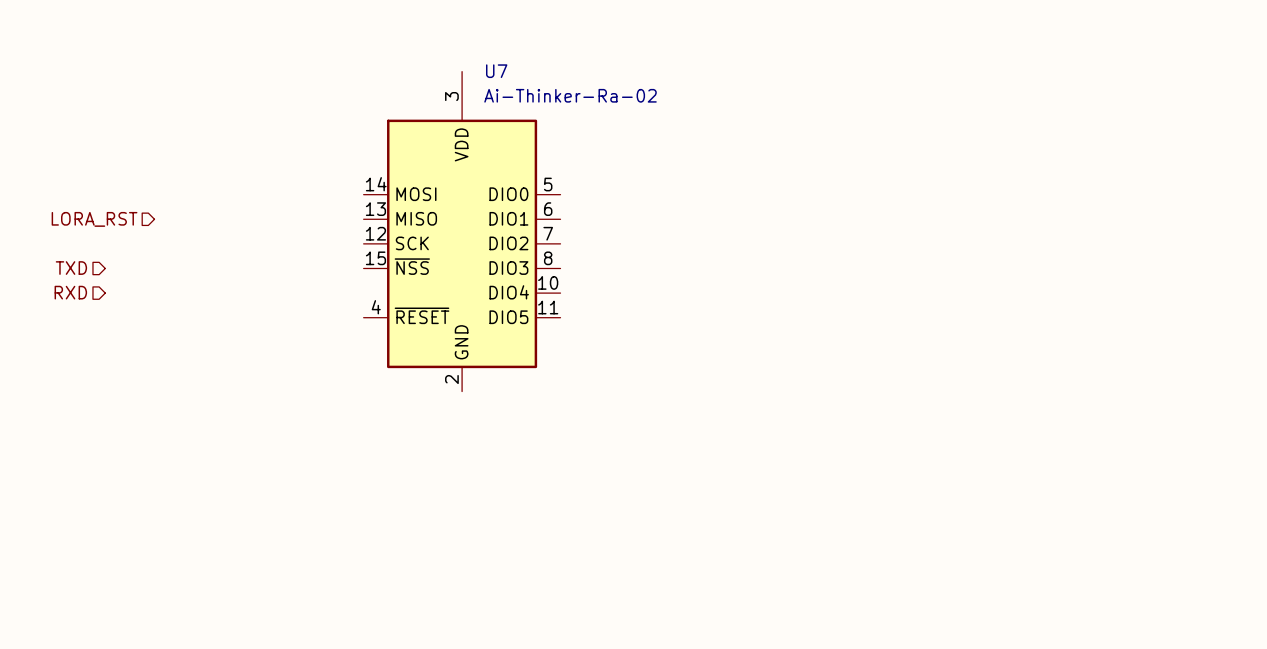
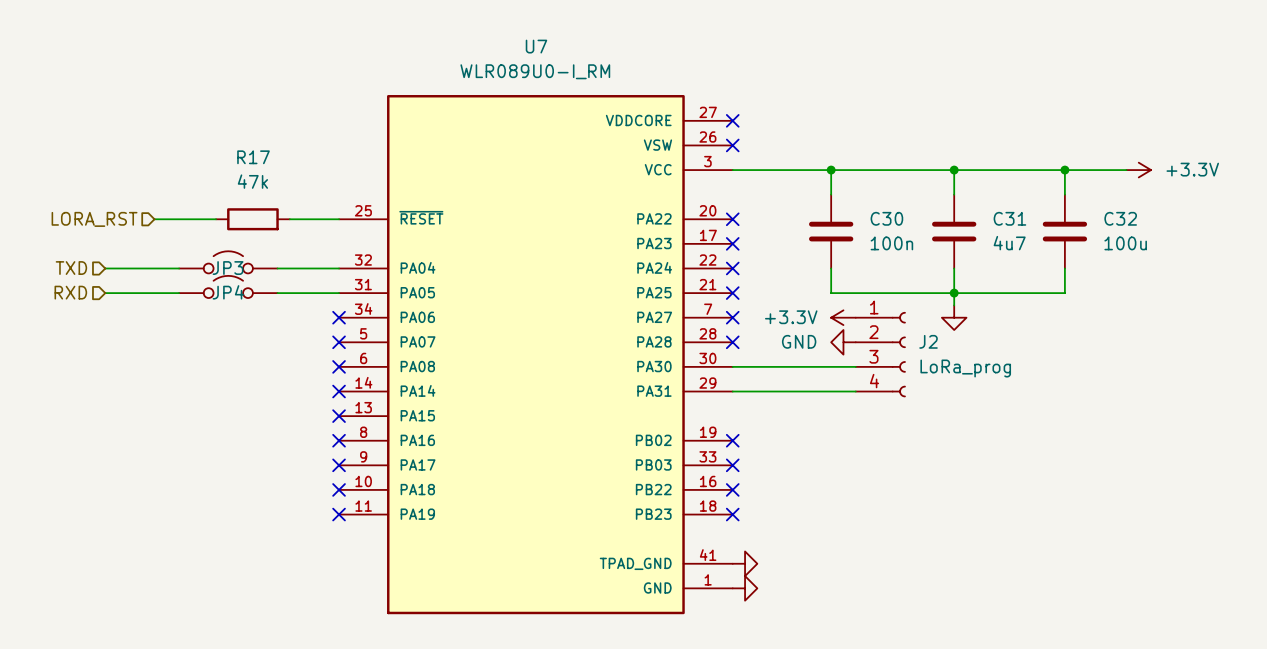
U7 symbol: [363, 71, 561, 392] -> [339, 95, 733, 615]
U7 name position: U7 (496, 71) -> U7 (536, 46)
U7 value: Ai-Thinker-Ra-02 (570, 95) -> WLR089U0-I_RM (535, 71)
no-connect mark: none -> (732, 120)
no-connect mark: none -> (732, 145)
wire: none -> (732, 170) (1126, 170)
wire: none -> (831, 170) (831, 194)
junction: none -> (831, 170)
wire: none -> (954, 170) (954, 194)
junction: none -> (954, 170)
wire: none -> (1064, 170) (1064, 194)
junction: none -> (1064, 170)
power symbol: none -> +3.3V (1138, 170)
wire: none -> (154, 219) (216, 219)
R17: none -> 47k (252, 219)
wire: none -> (289, 219) (339, 219)
no-connect mark: none -> (732, 219)
C30: none -> 100n (831, 231)
C31: none -> 4u7 (954, 231)
C32: none -> 100u (1064, 231)
no-connect mark: none -> (732, 243)
JP3: none -> (228, 262)
wire: none -> (105, 268) (179, 268)
wire: none -> (277, 268) (339, 268)
no-connect mark: none -> (732, 268)
wire: none -> (831, 268) (831, 293) (1064, 293) (1064, 268)
wire: none -> (954, 268) (954, 305)
JP4: none -> (228, 286)
wire: none -> (105, 293) (179, 293)
wire: none -> (277, 293) (339, 293)
no-connect mark: none -> (732, 293)
junction: none -> (954, 293)
no-connect mark: none -> (339, 317)
no-connect mark: none -> (732, 317)
power symbol: none -> +3.3V (843, 317)
power symbol: none -> (954, 317)
no-connect mark: none -> (339, 342)
no-connect mark: none -> (732, 342)
power symbol: none -> GND (843, 342)
J2: none -> LoRa_prog (880, 354)
no-connect mark: none -> (339, 366)
wire: none -> (732, 366) (855, 366)
no-connect mark: none -> (339, 391)
wire: none -> (732, 391) (855, 391)
no-connect mark: none -> (339, 416)
no-connect mark: none -> (339, 440)
no-connect mark: none -> (732, 440)
no-connect mark: none -> (339, 465)
no-connect mark: none -> (732, 465)
no-connect mark: none -> (339, 489)
no-connect mark: none -> (732, 489)
no-connect mark: none -> (339, 514)
no-connect mark: none -> (732, 514)
power symbol: none -> (745, 563)
power symbol: none -> (745, 588)

